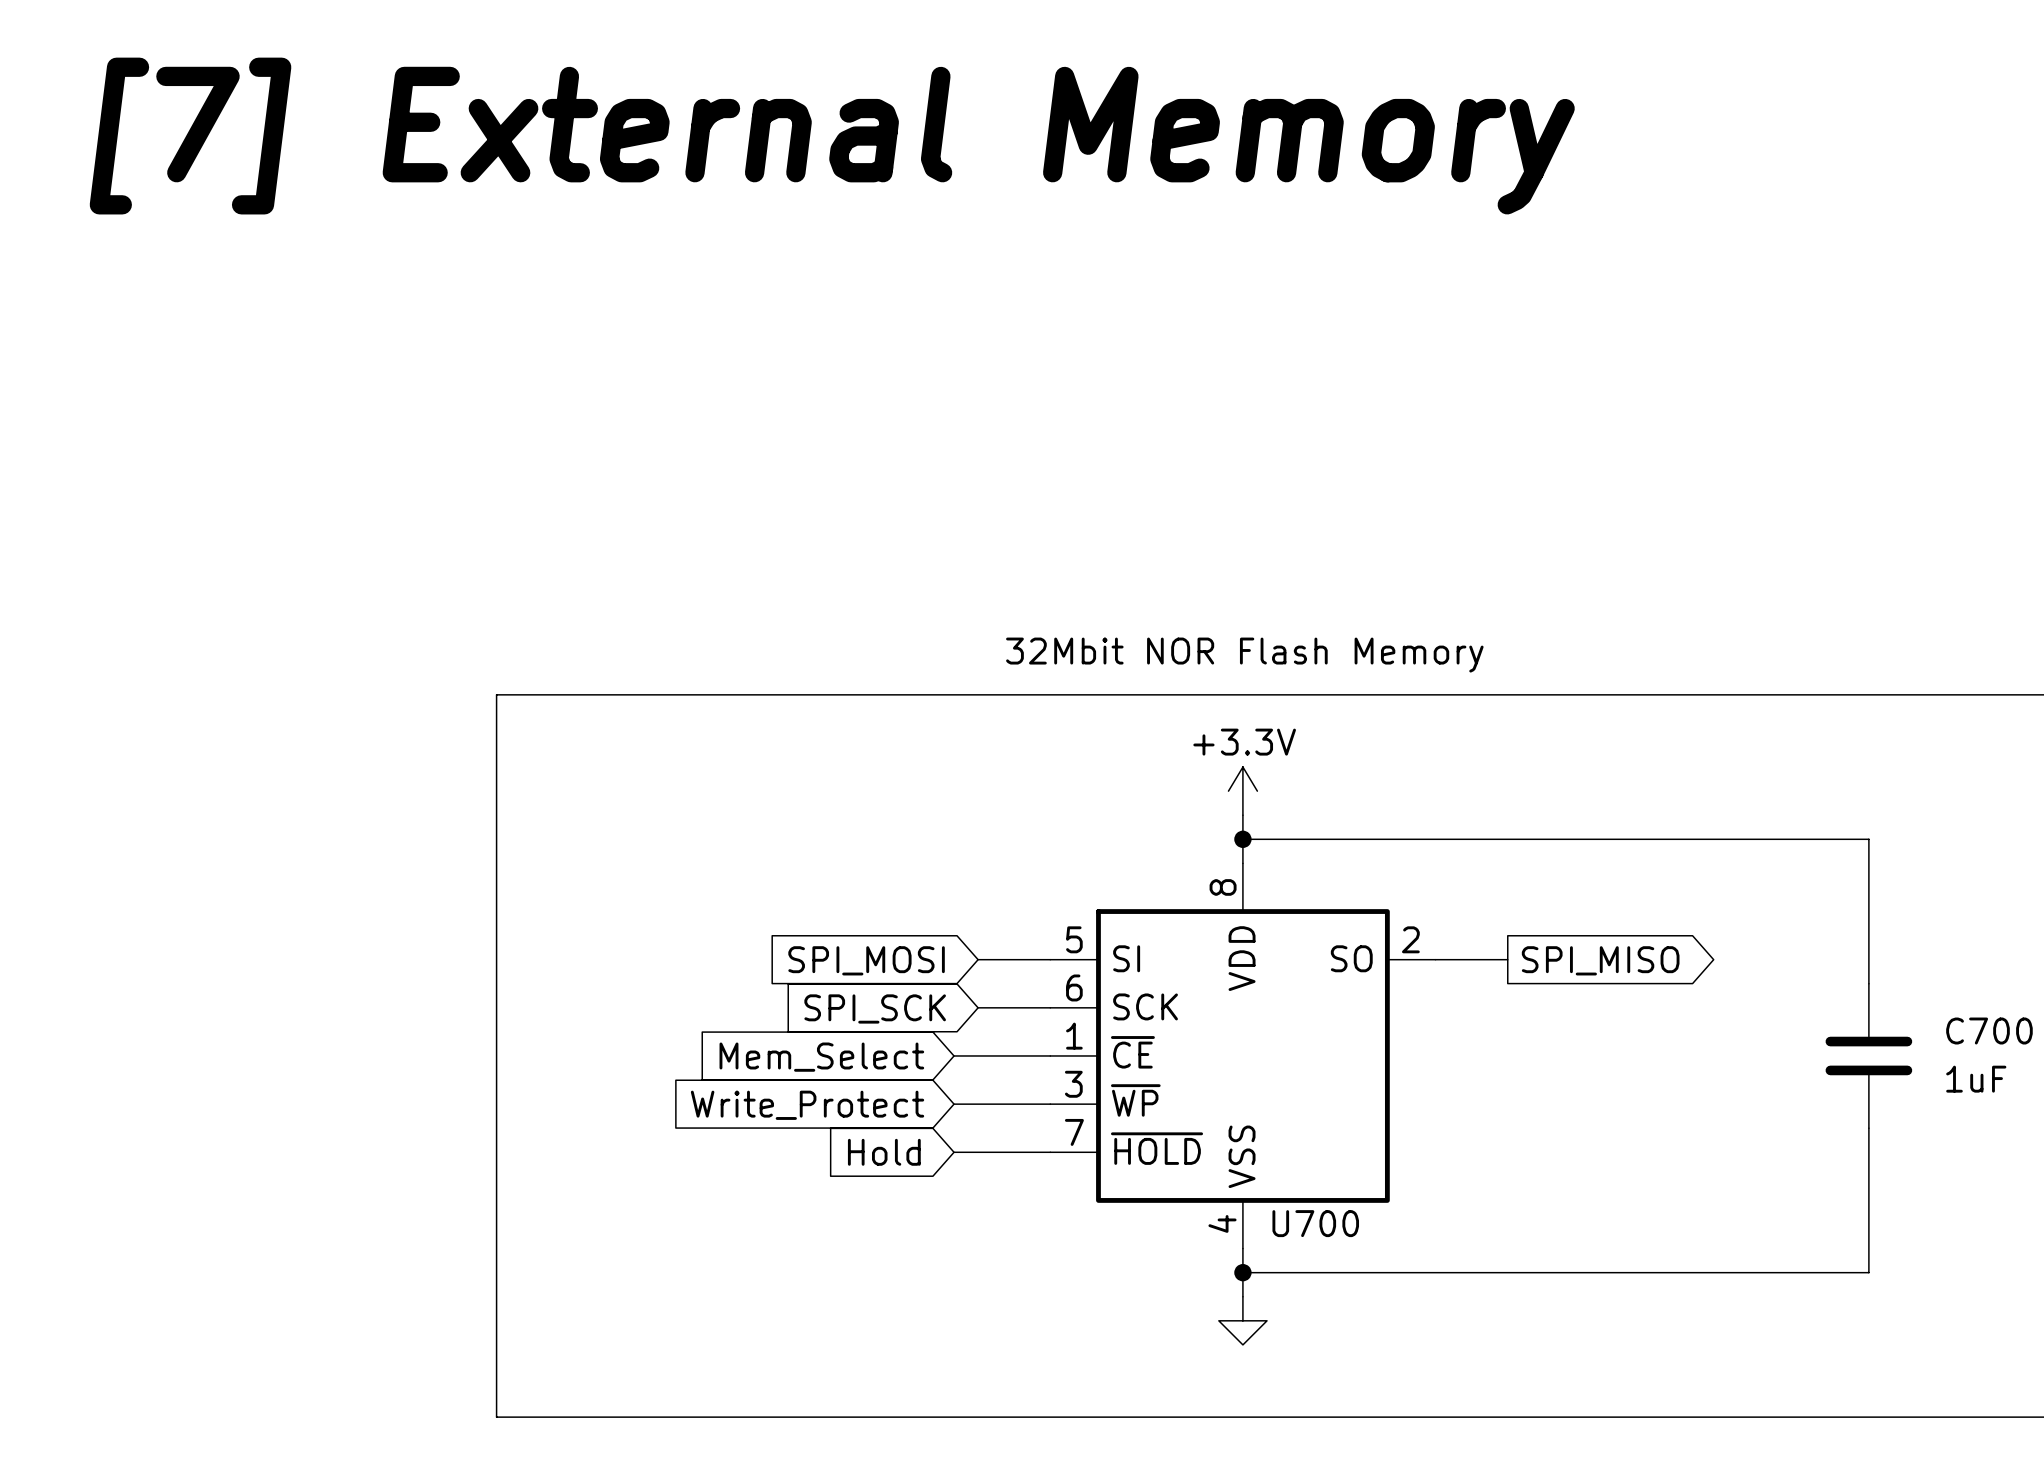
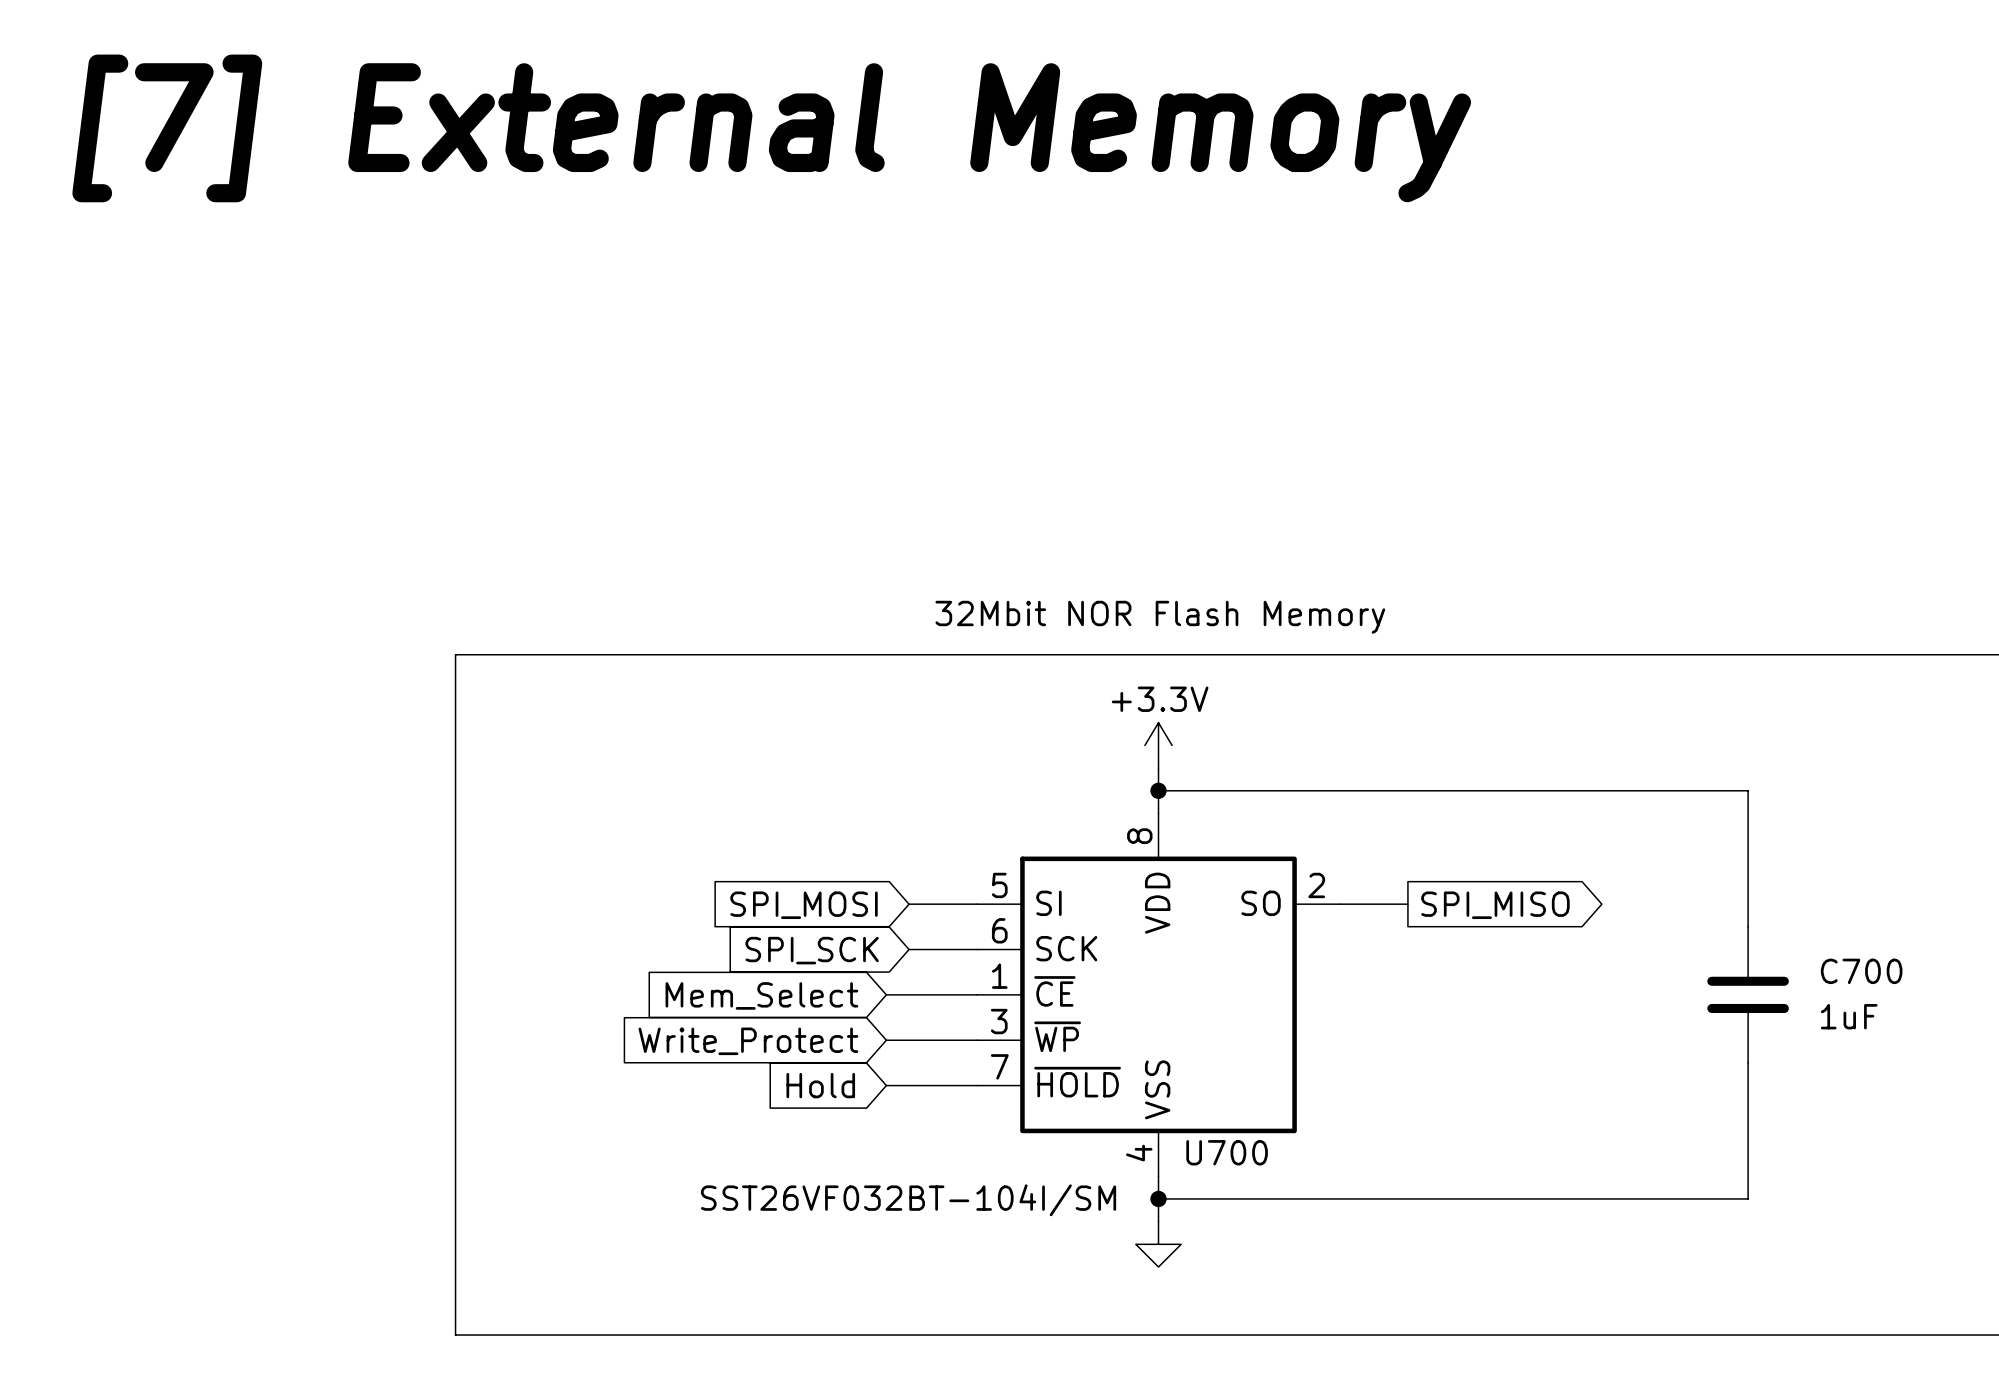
U700 value: none -> SST26VF032BT-104I/SM (908, 1200)

